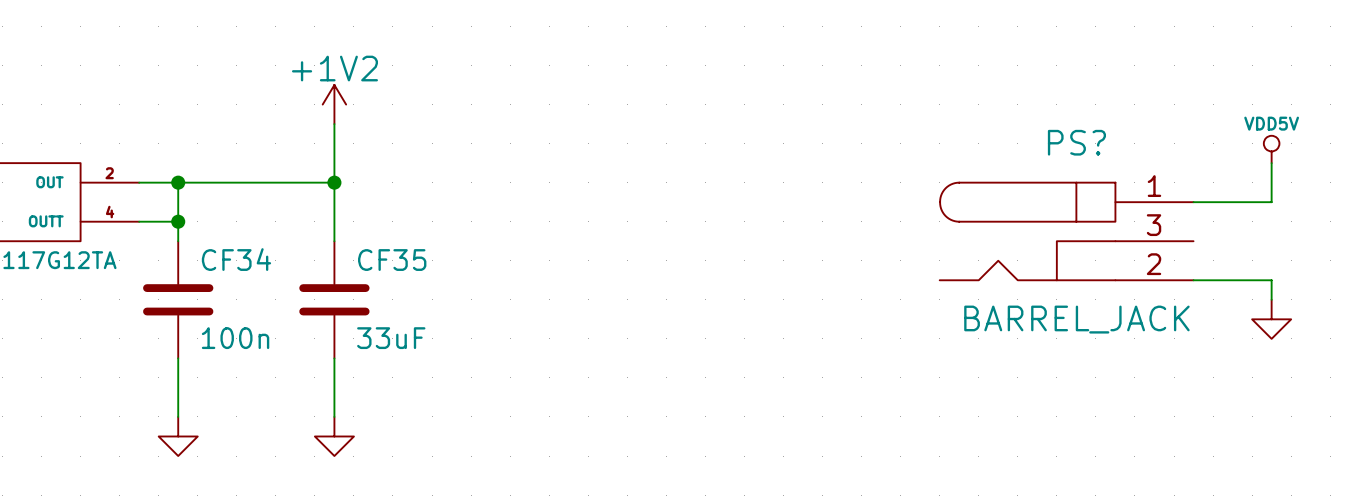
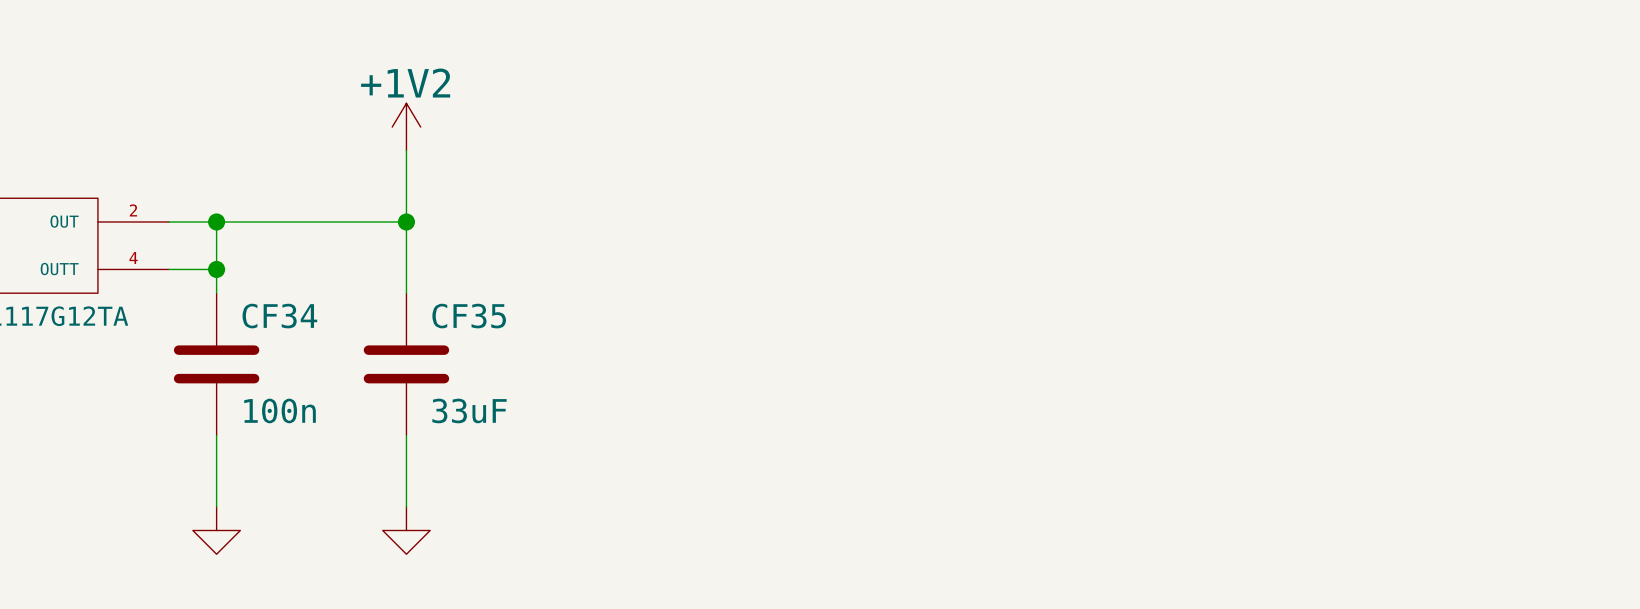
power symbol: VDD5V (1271, 149) -> none
wire: (1271, 163) (1271, 202) (1193, 202) -> none
PS?: BARREL_JACK (1066, 231) -> none
wire: (1193, 280) (1271, 280) (1271, 299) -> none
power symbol: (1271, 319) -> none

